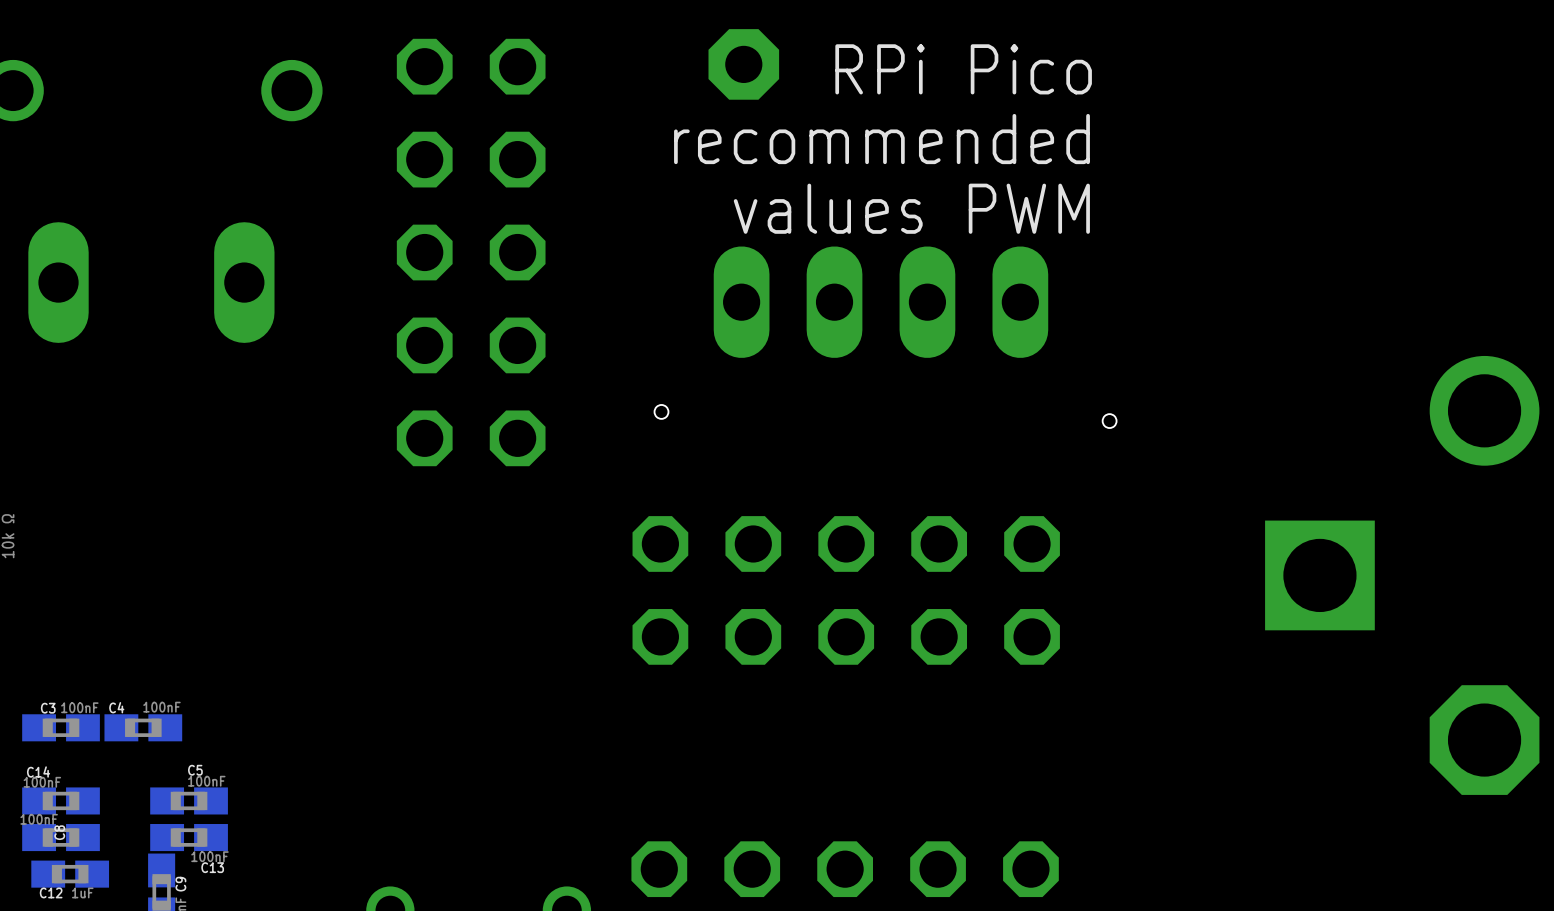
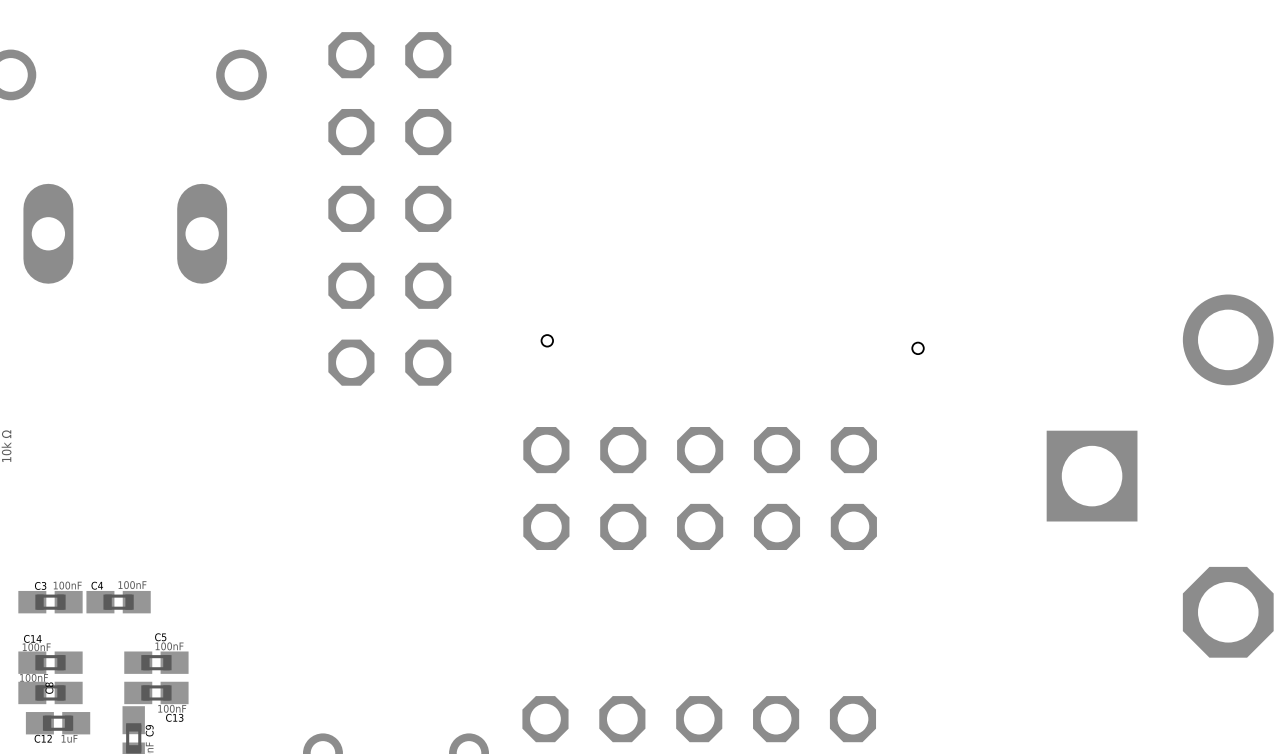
part: (743, 64) -> none
text: RPi Pico (963, 69) -> none
text: recommended (881, 139) -> none
text: values PWM (911, 208) -> none
part: (880, 302) -> none

